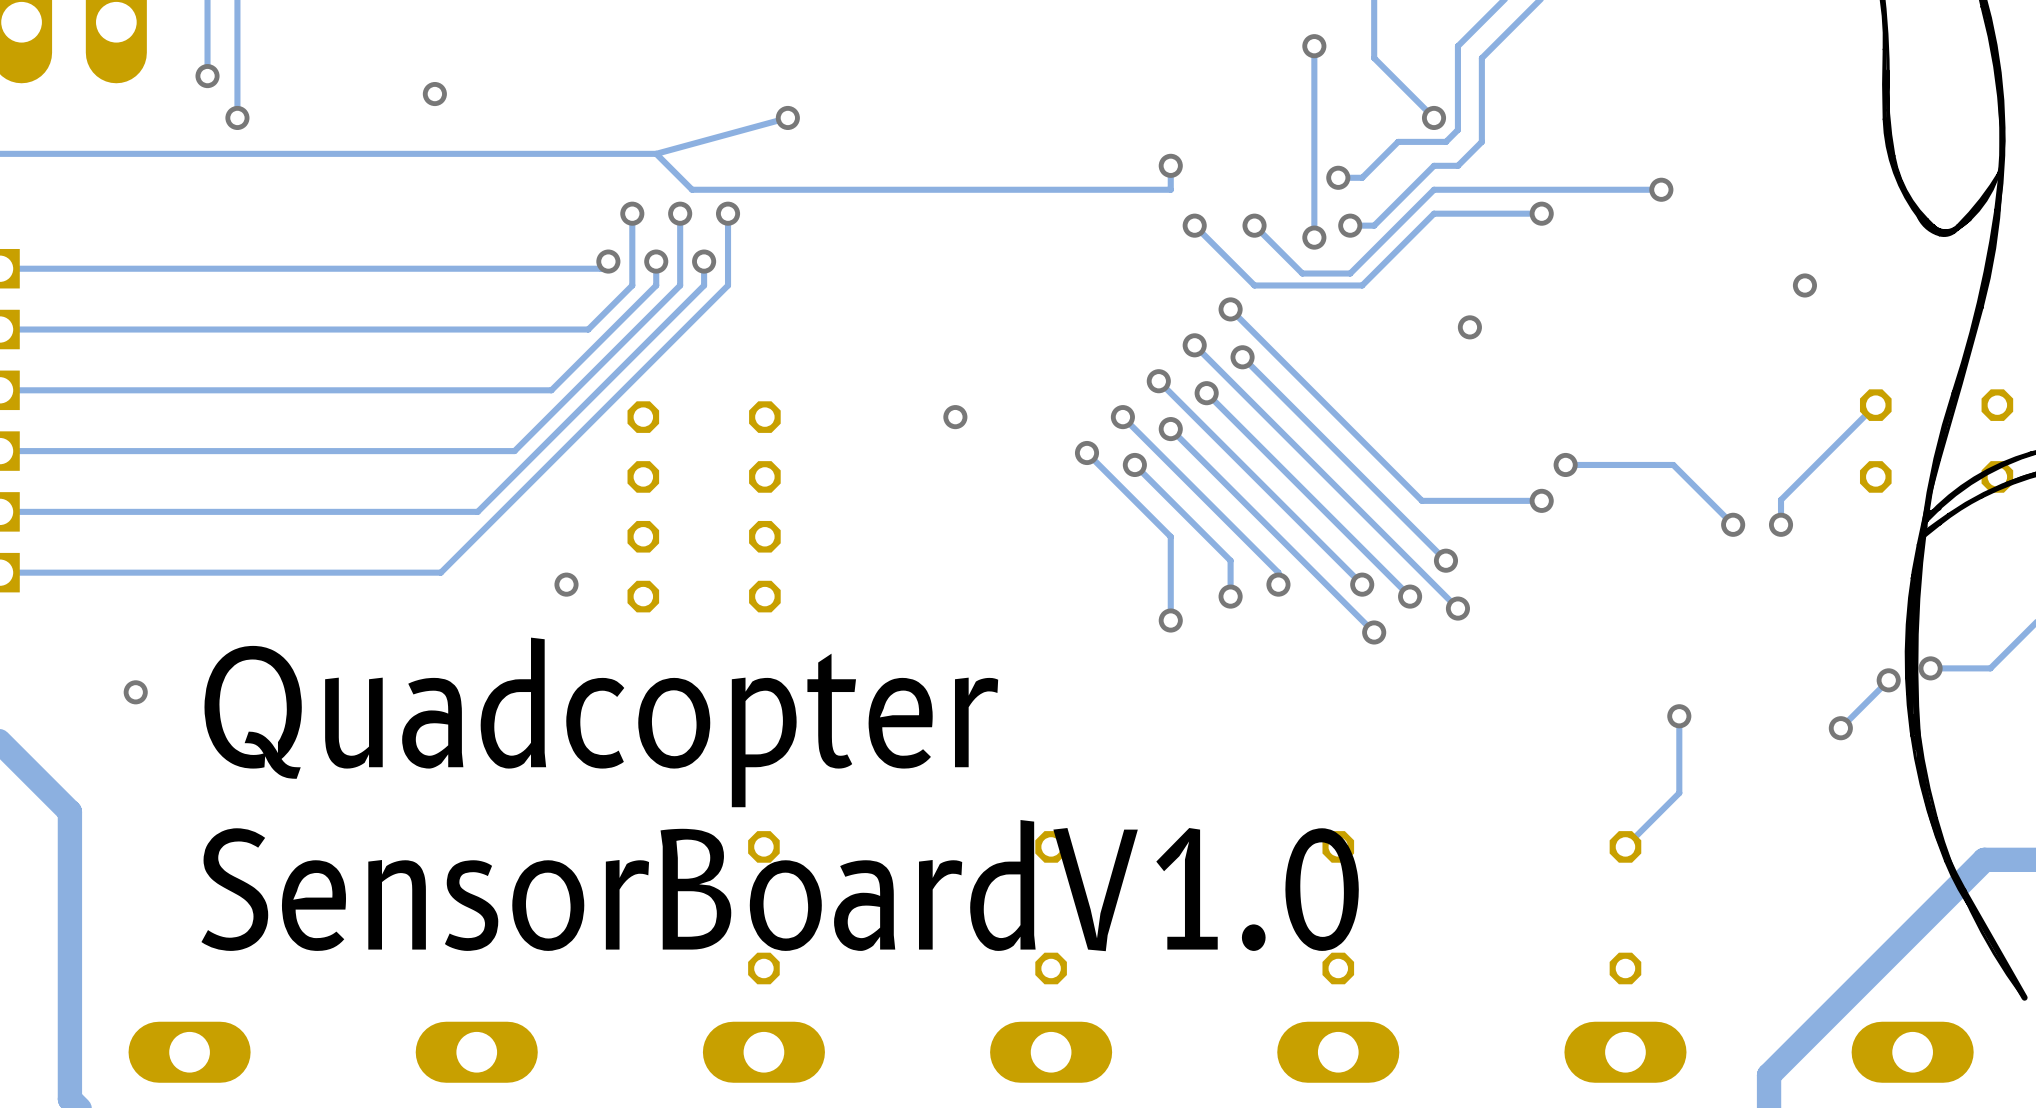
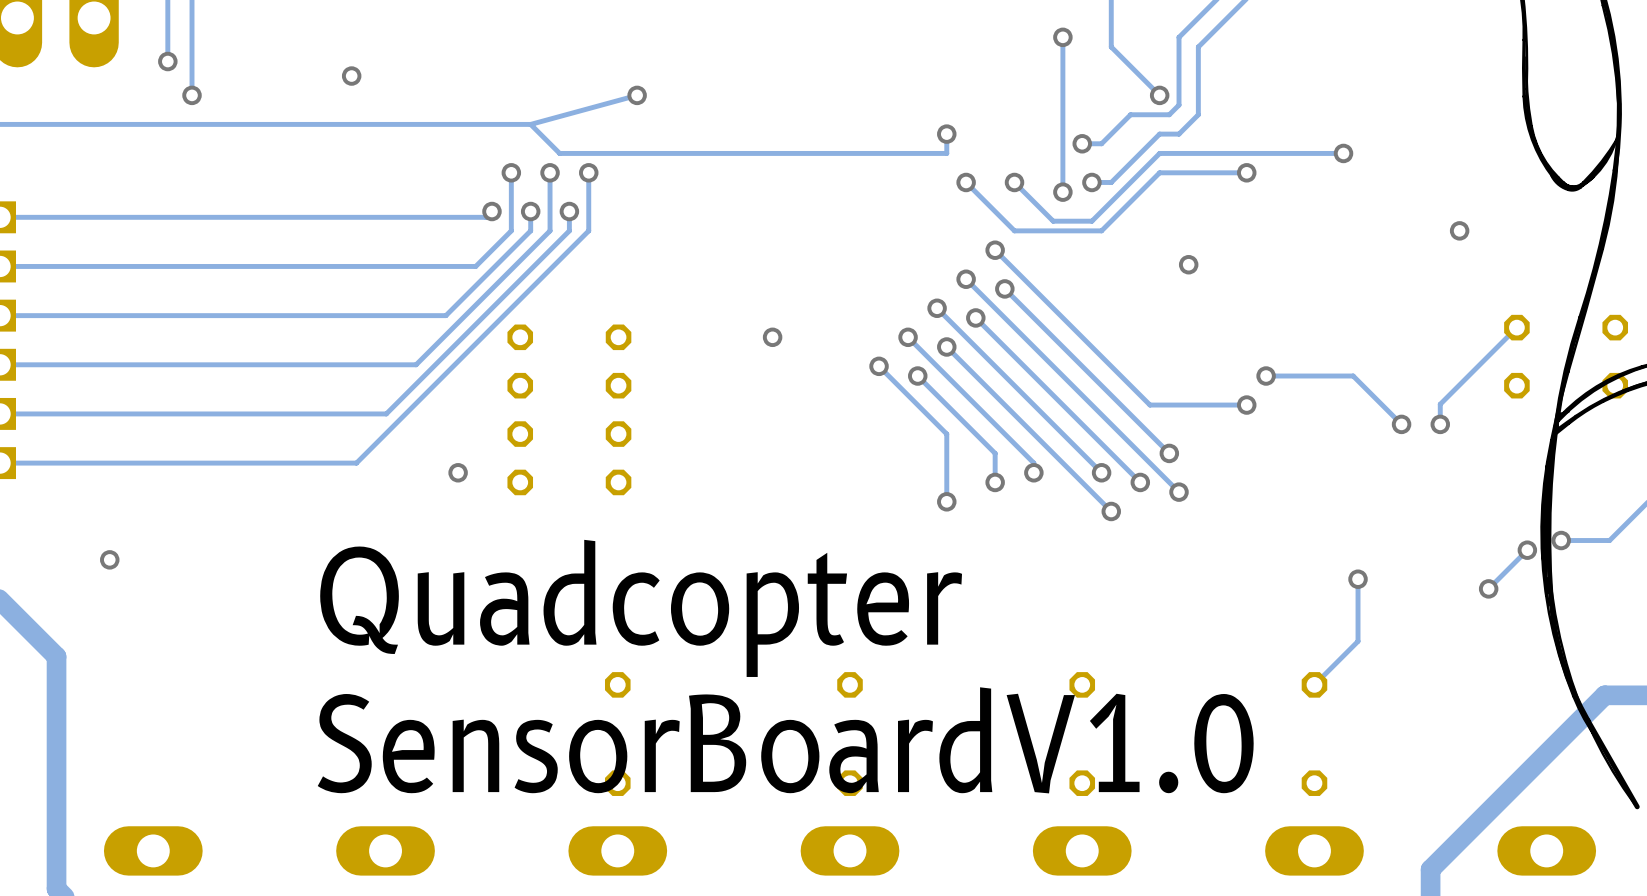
text position: Quadcopter (601, 722) -> Quadcopter (641, 608)
text position: SensorBoardV1.0 (780, 885) -> SensorBoardV1.0 (785, 740)

